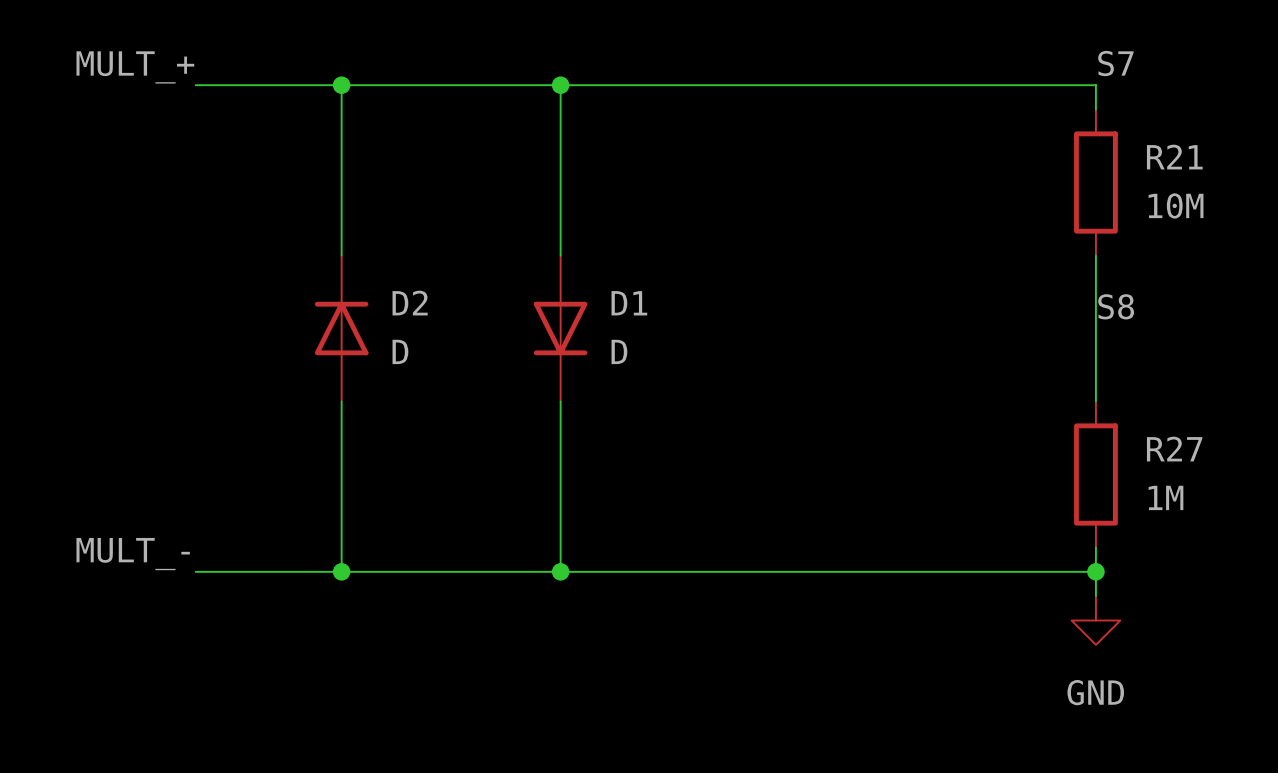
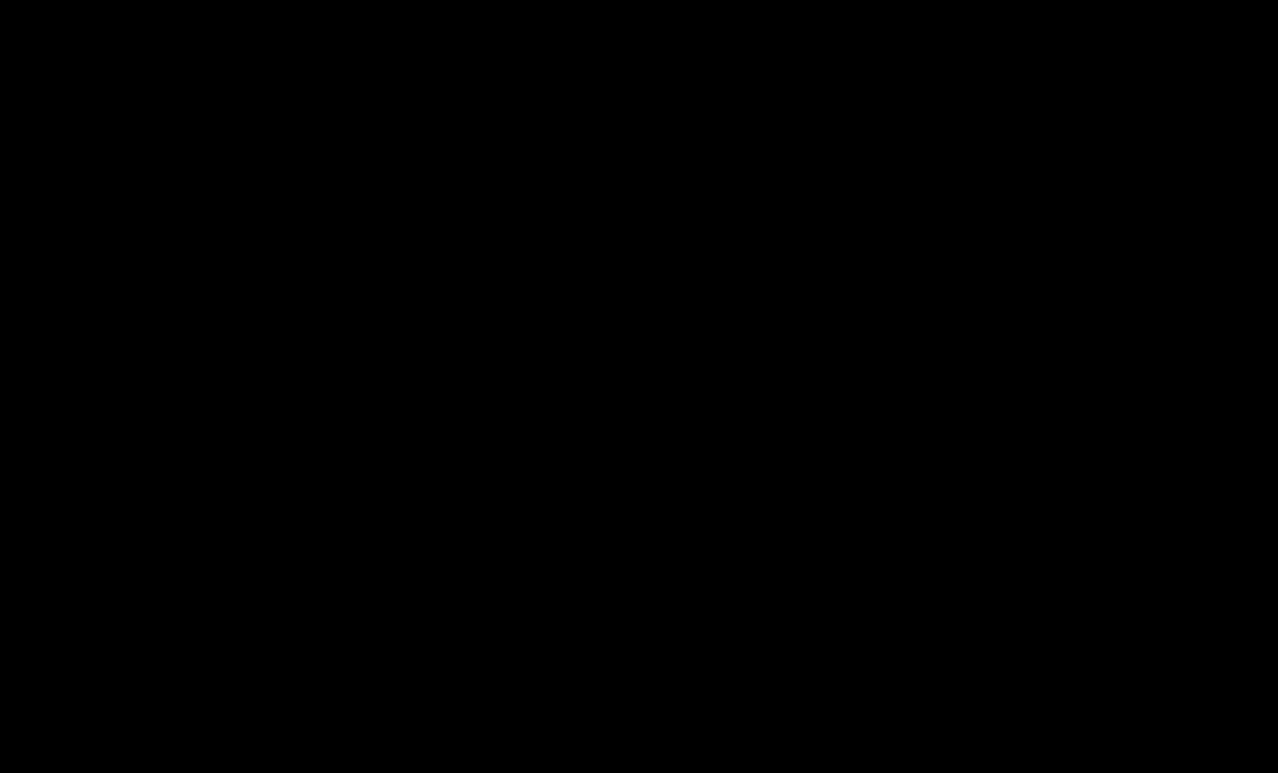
label: S7 (1115, 63) -> none
label: MULT_+ (135, 67) -> none
wire: (195, 85) (1095, 85) (1095, 109) -> none
wire: (341, 85) (341, 255) -> none
junction: (341, 85) -> none
wire: (560, 85) (560, 255) -> none
junction: (560, 85) -> none
R21: 10M (1095, 182) -> none
wire: (1095, 255) (1095, 401) -> none
label: S8 (1116, 306) -> none
D2: D (341, 328) -> none
D1: D (560, 328) -> none
wire: (341, 401) (341, 571) -> none
wire: (560, 401) (560, 571) -> none
R27: 1M (1095, 474) -> none
wire: (1095, 547) (1095, 596) -> none
label: MULT_- (133, 554) -> none
wire: (195, 571) (1095, 571) -> none
junction: (341, 571) -> none
junction: (560, 571) -> none
junction: (1095, 571) -> none
power symbol: GND (1095, 620) -> none

